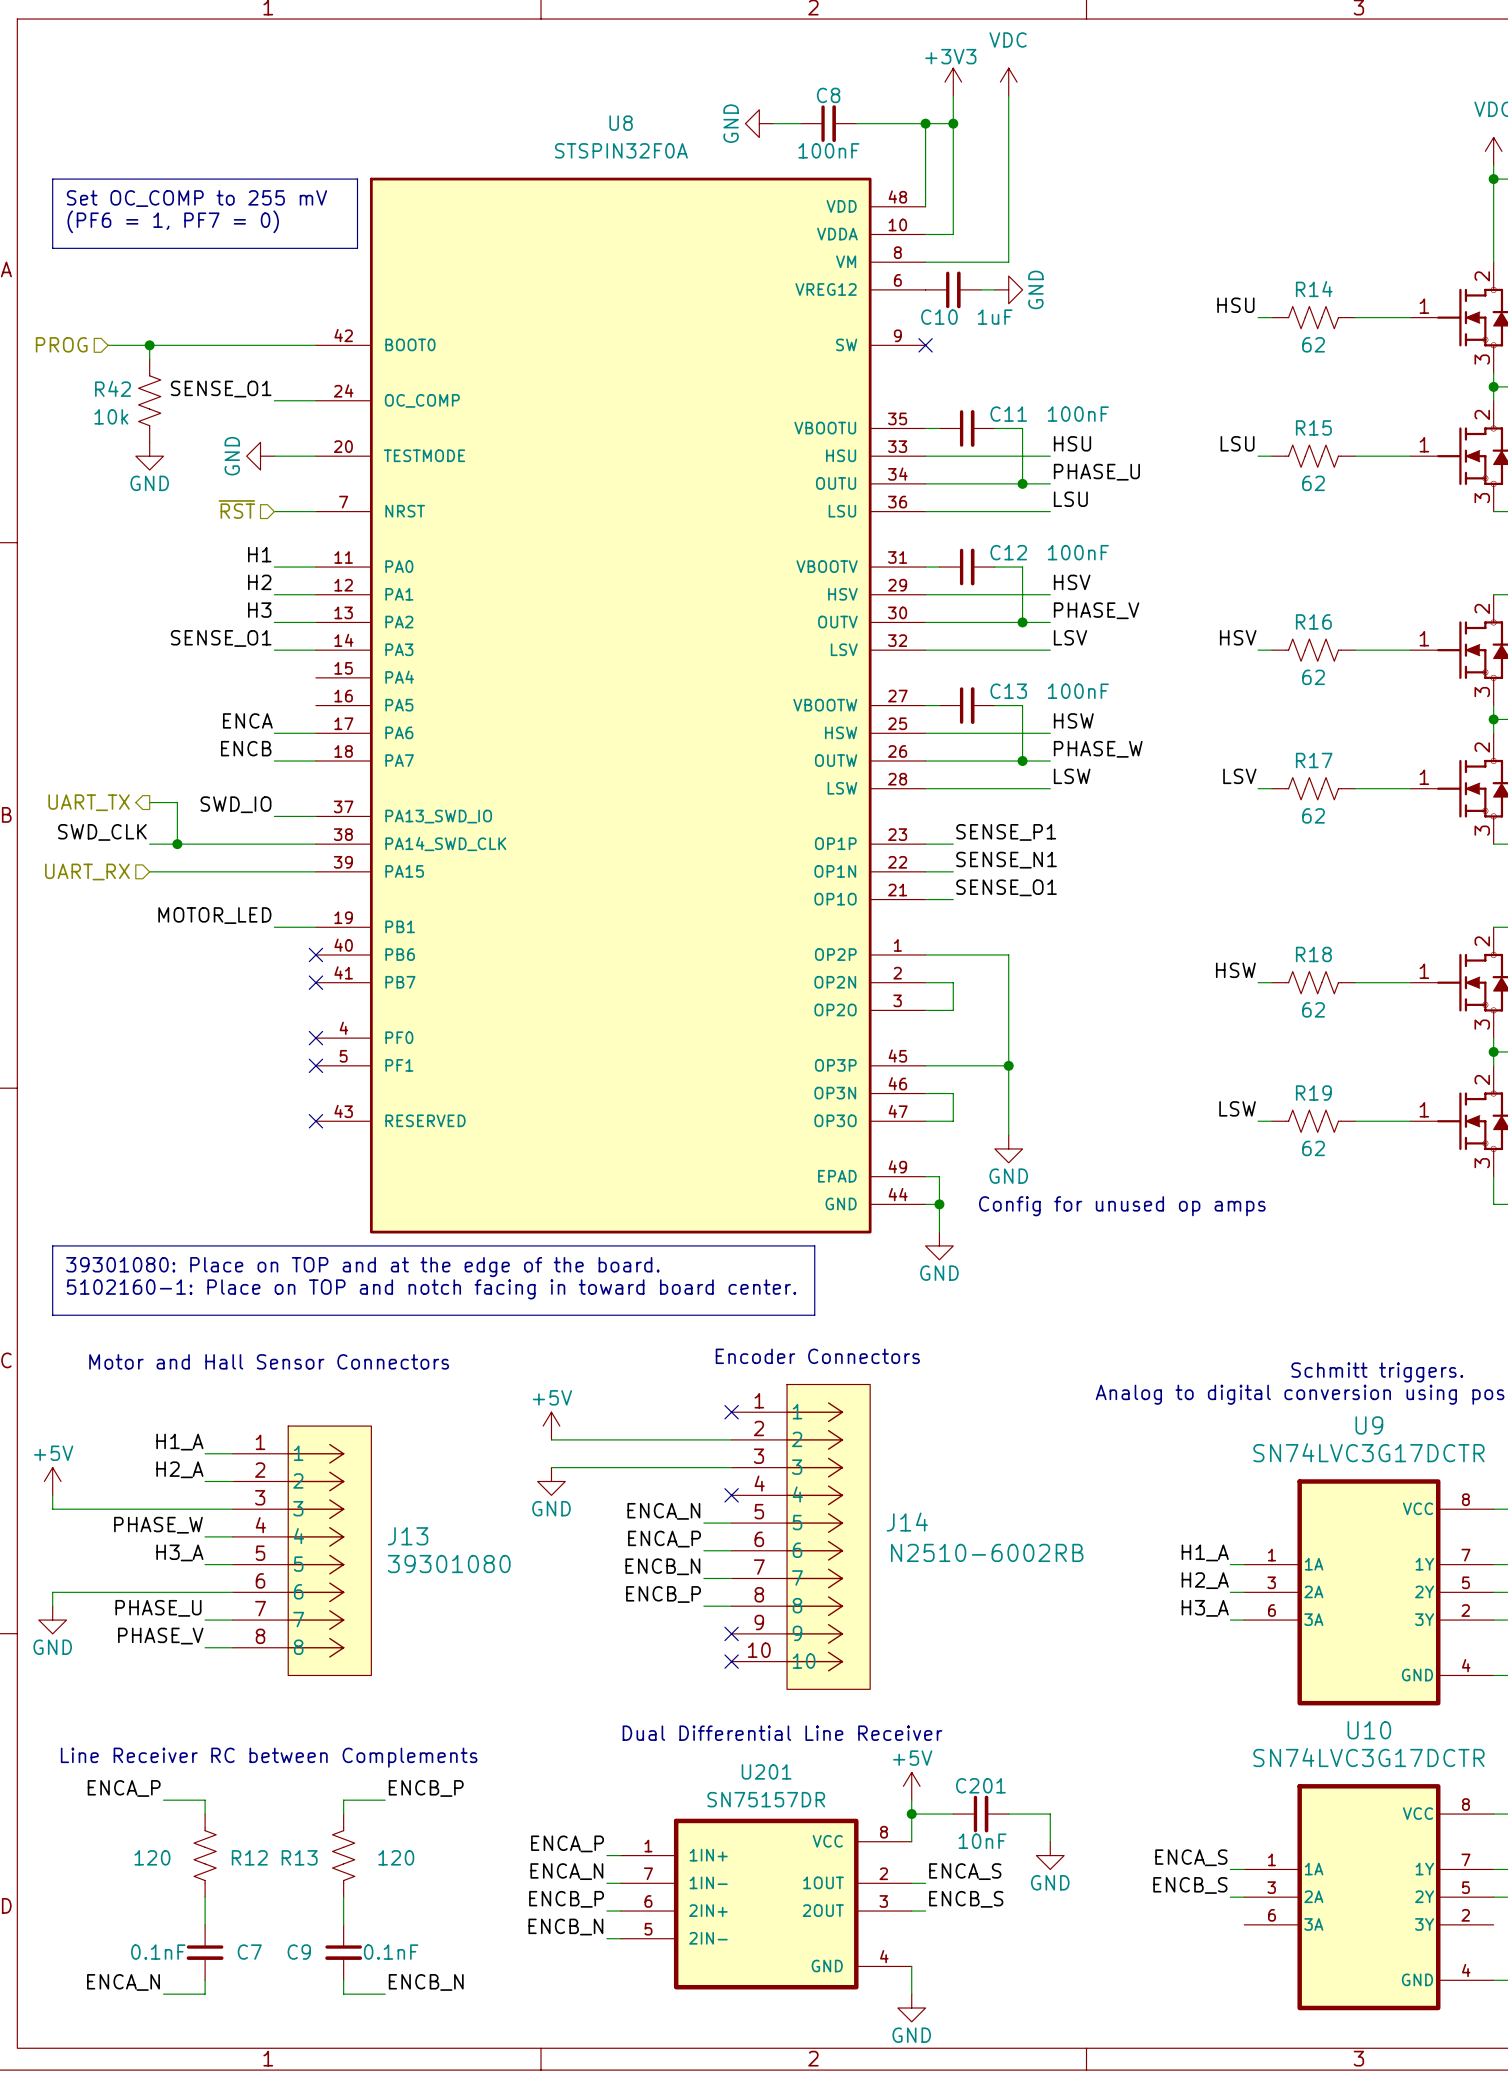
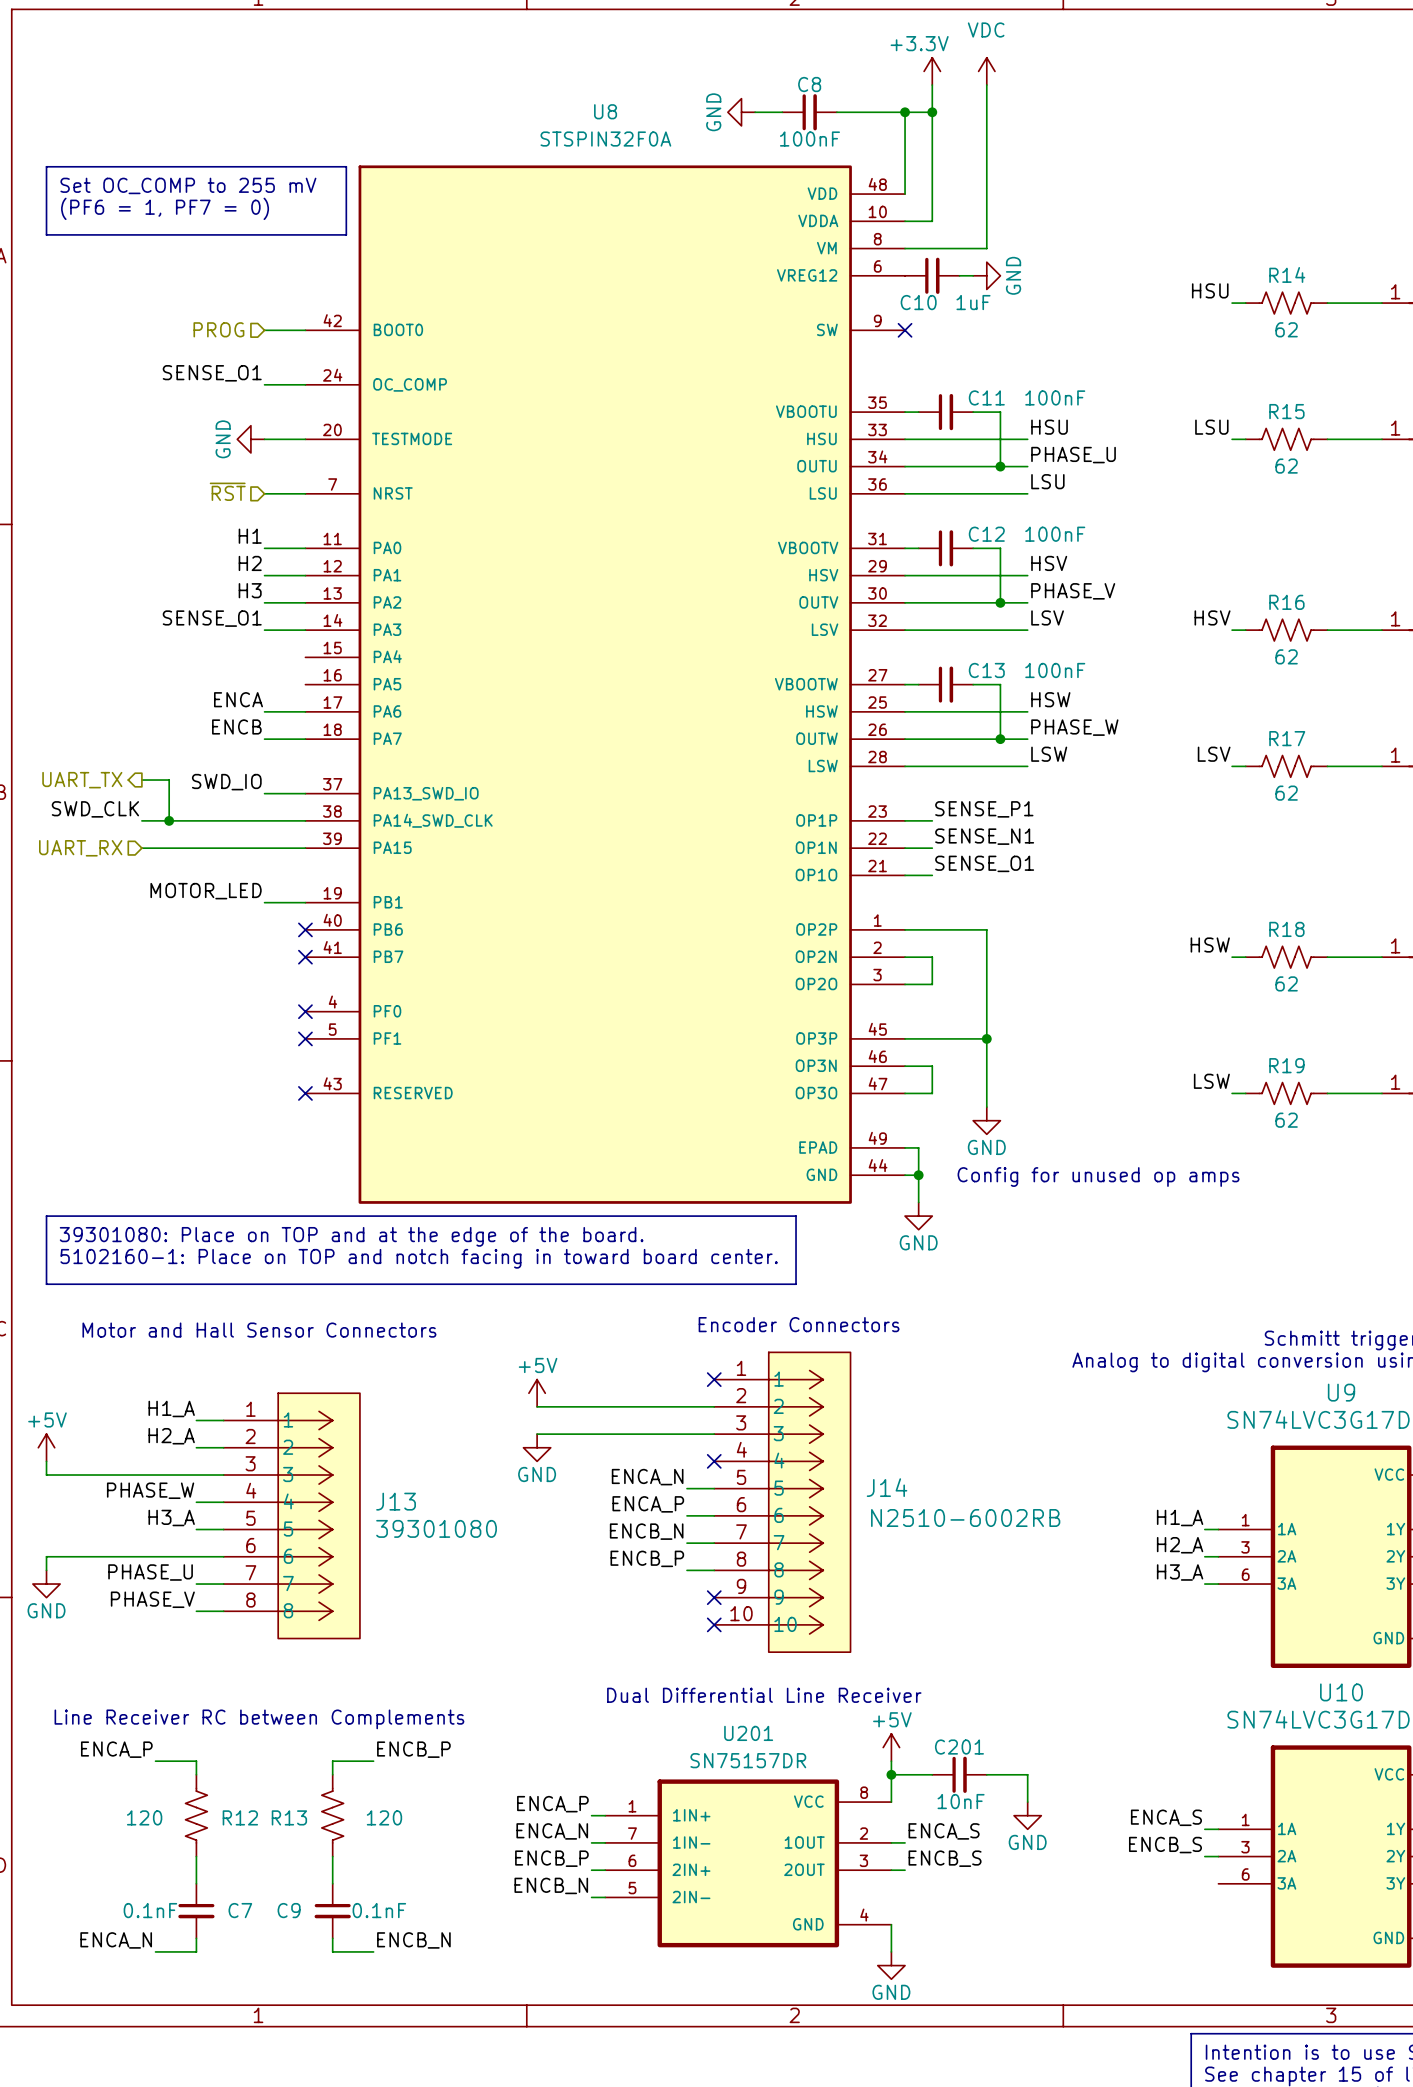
power symbol: +3V3 (953, 82) -> +3.3V (932, 71)
hierarchical label position: PROG (61, 344) -> PROG (218, 329)
wire: (108, 345) (274, 345) -> none
wire: (149, 345) (149, 359) -> none
junction: (149, 345) -> none
R42: 10k (149, 400) -> none
power symbol: GND (149, 456) -> none

